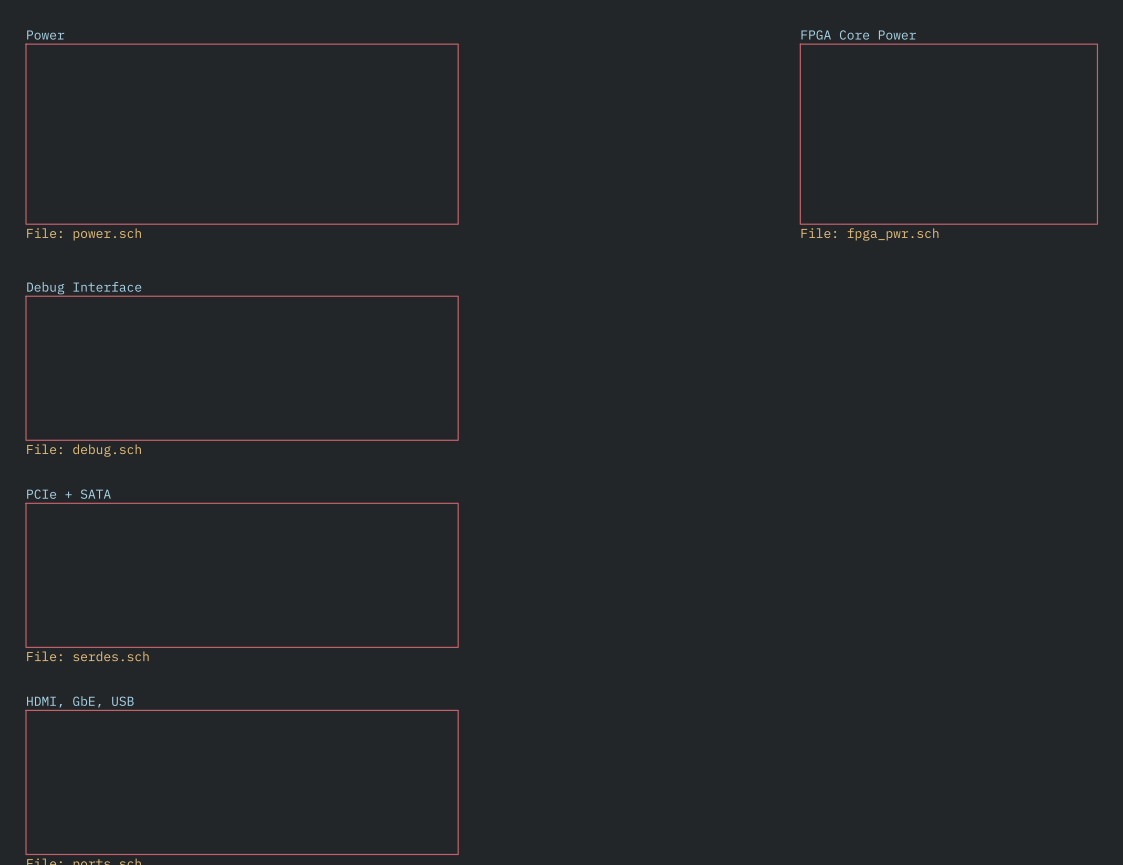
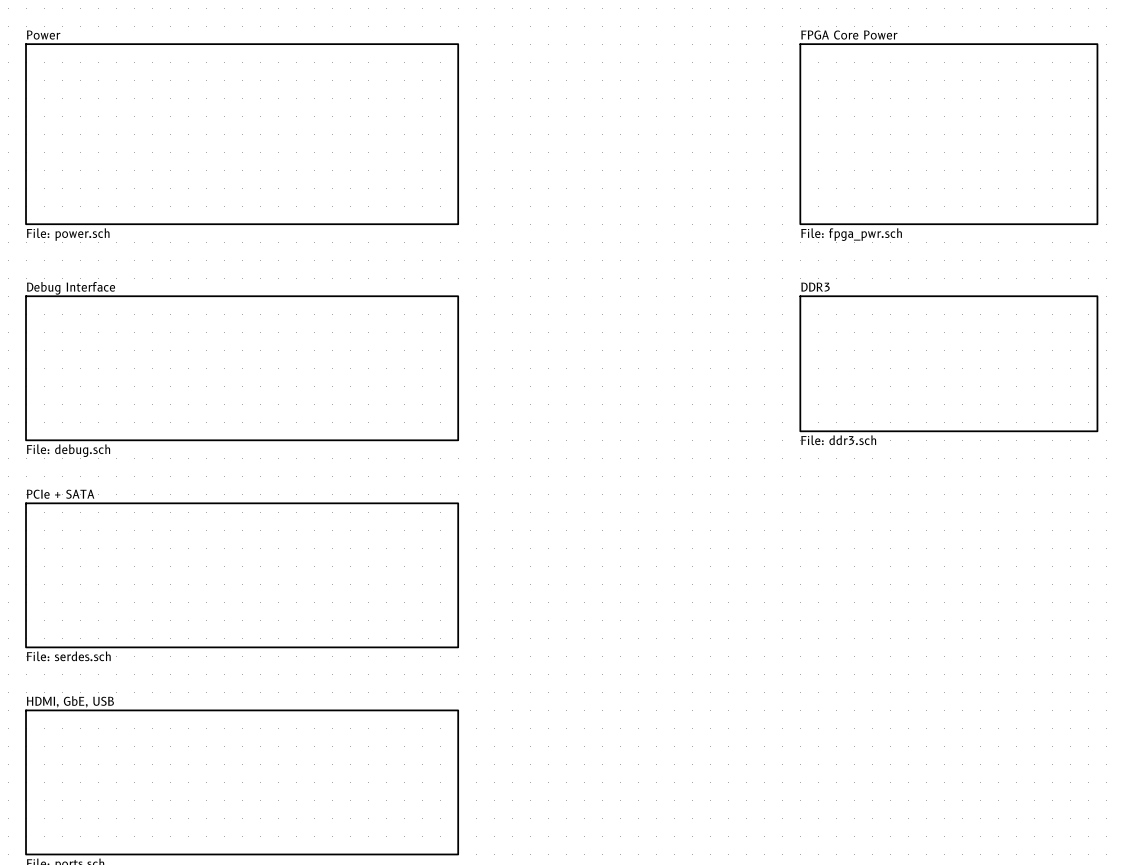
sheet DDR3: none -> File: ddr3.sch (948, 363)

